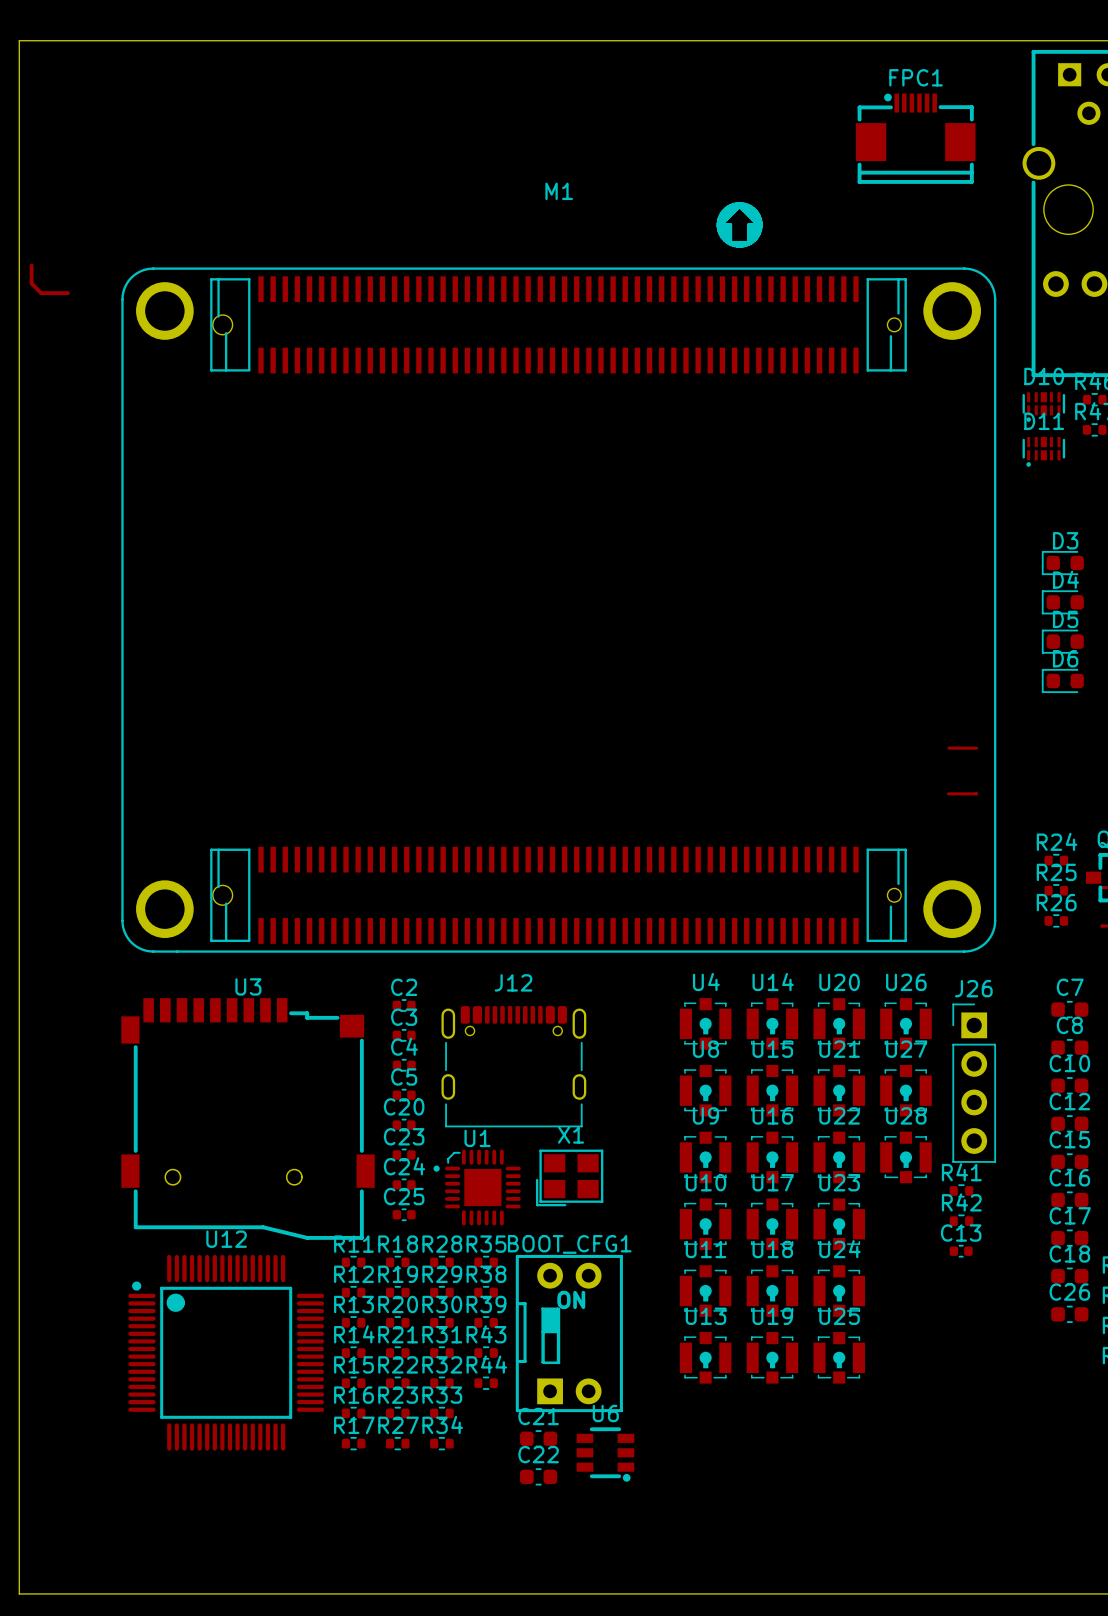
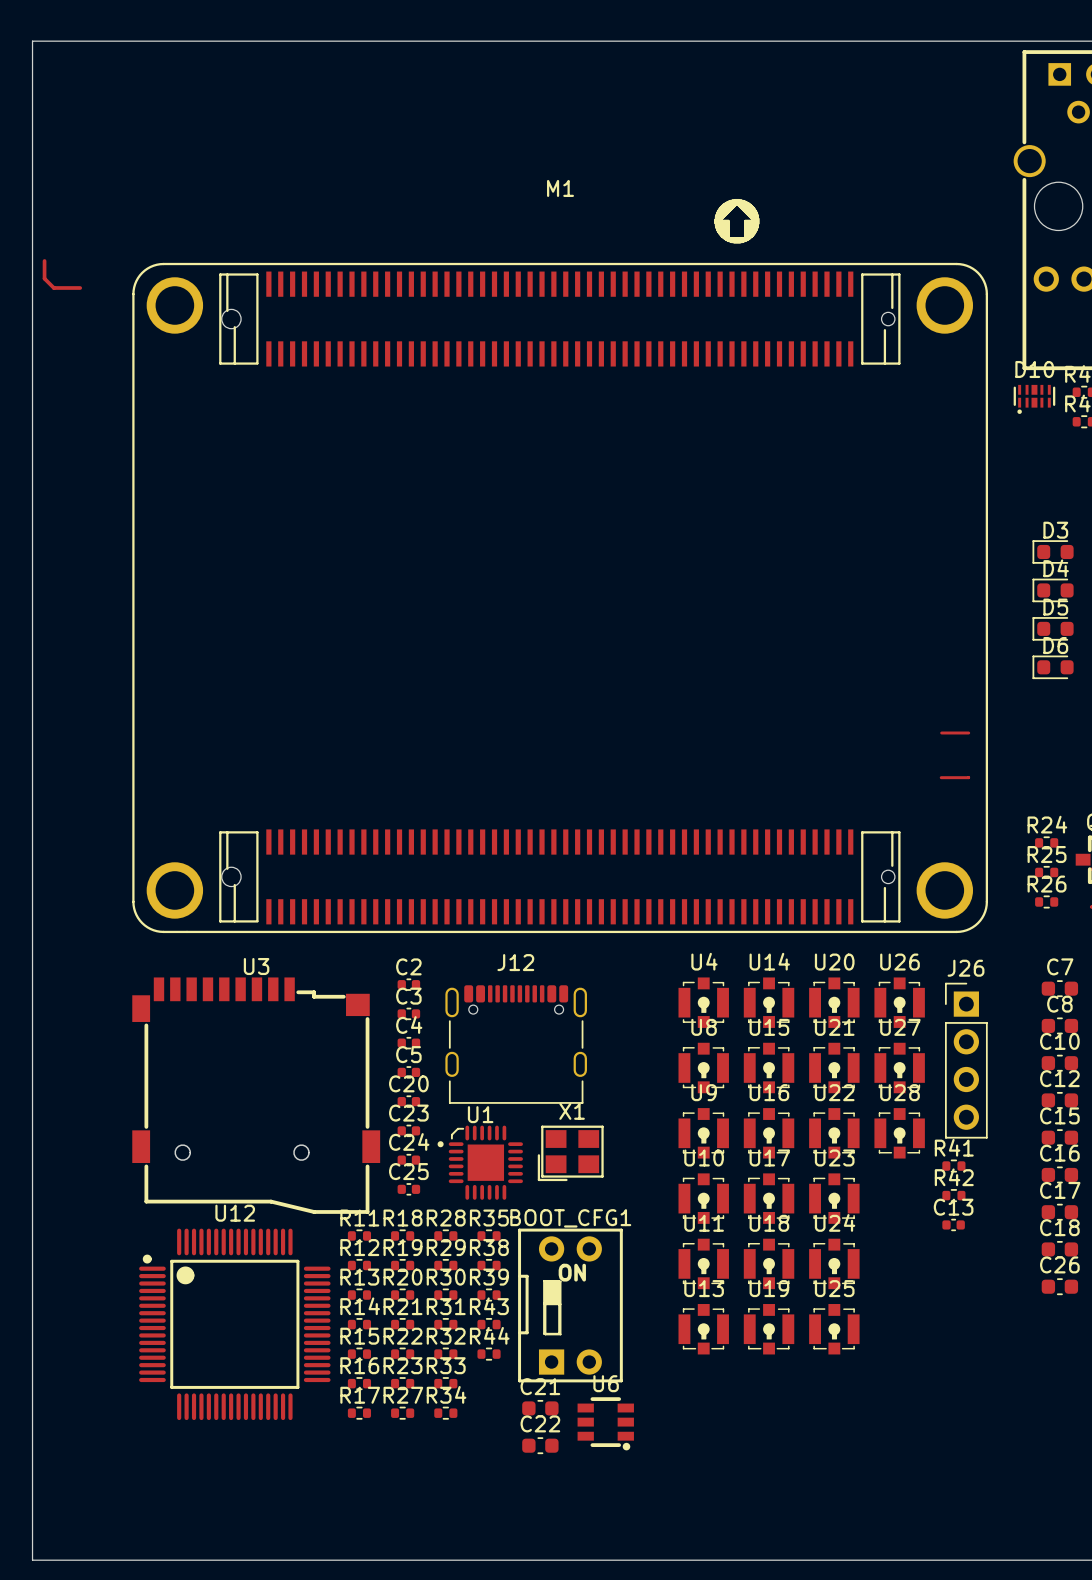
FPC1: (915, 138) -> none
D11: (1043, 451) -> none

